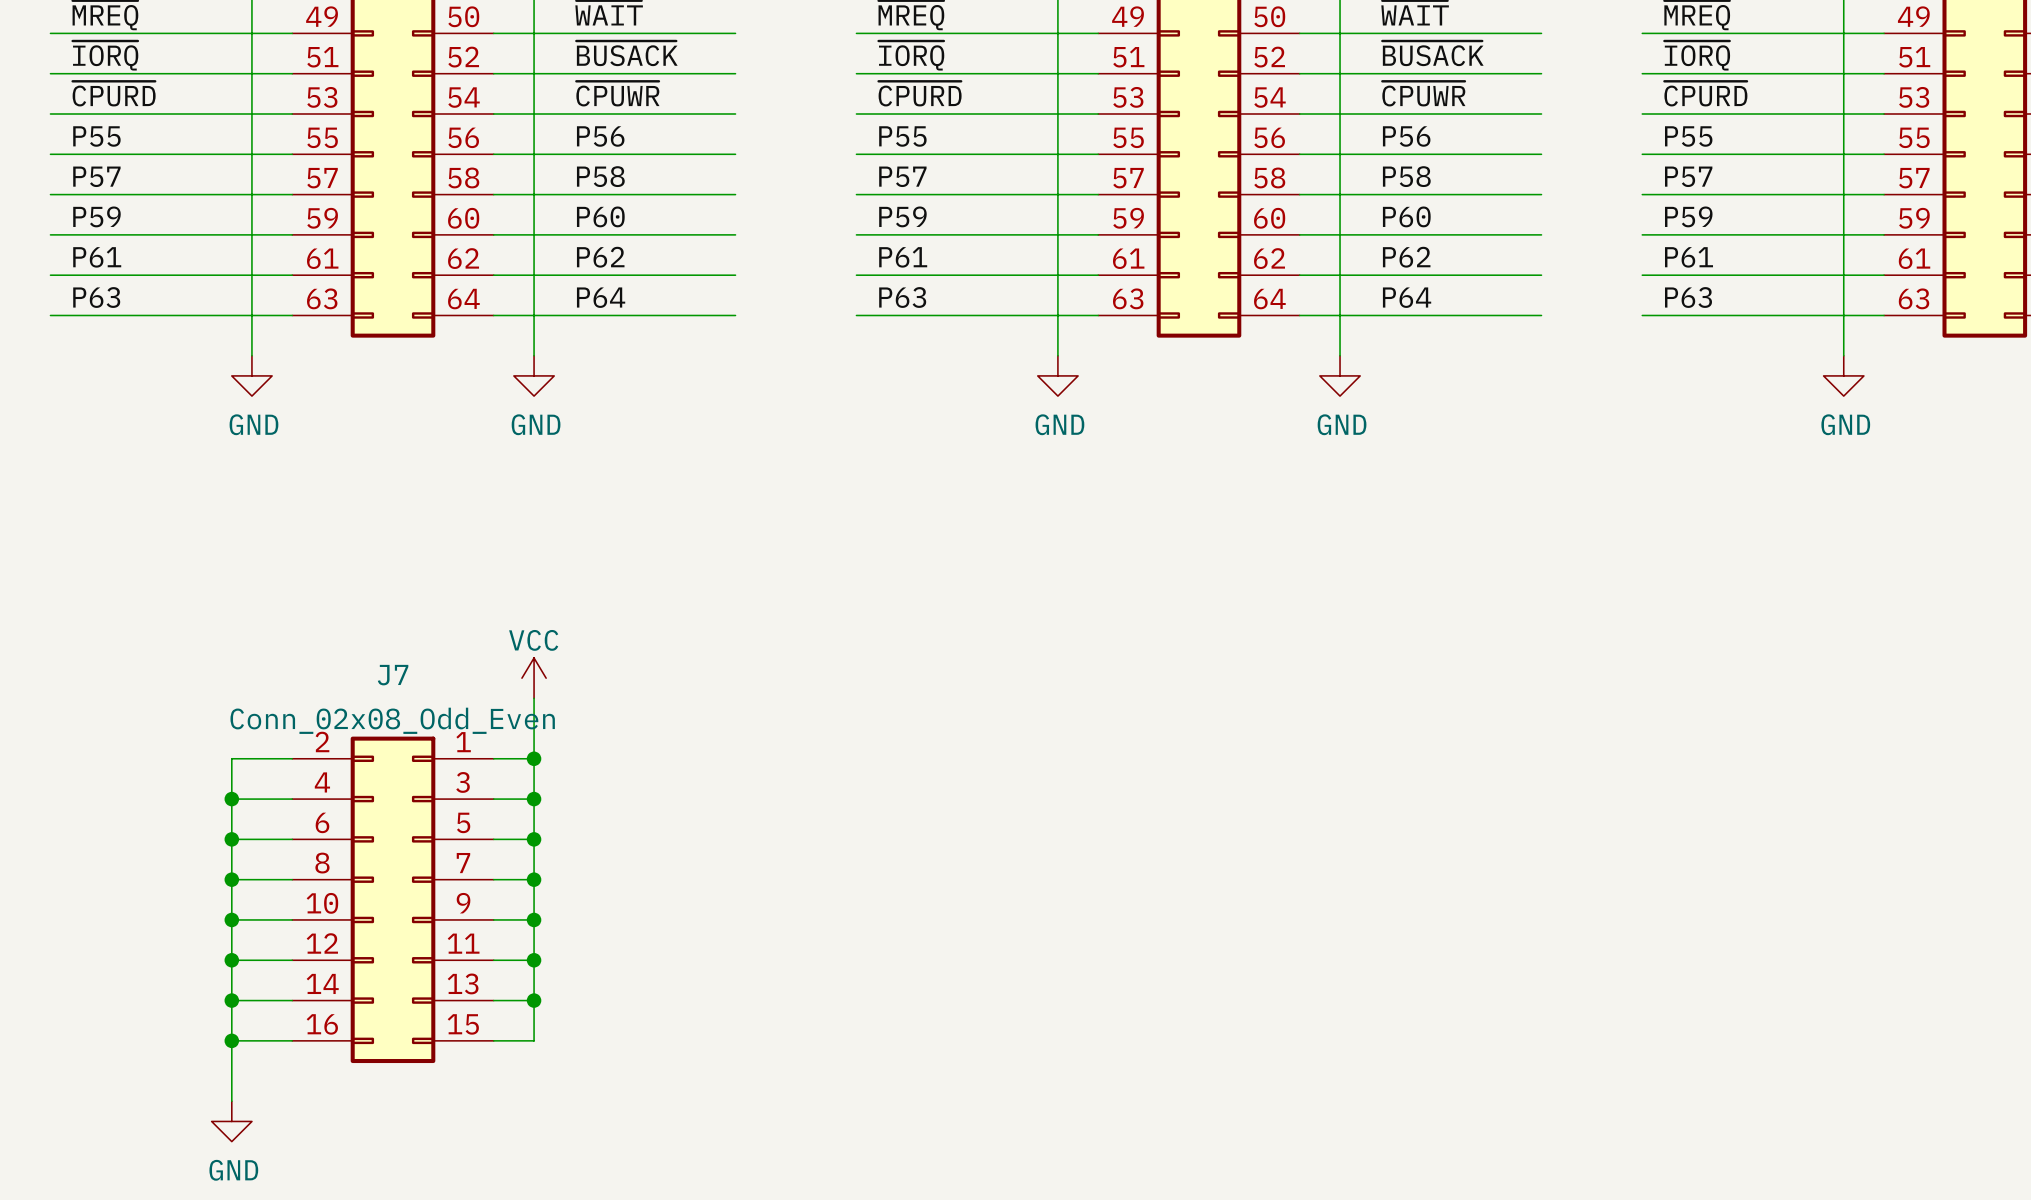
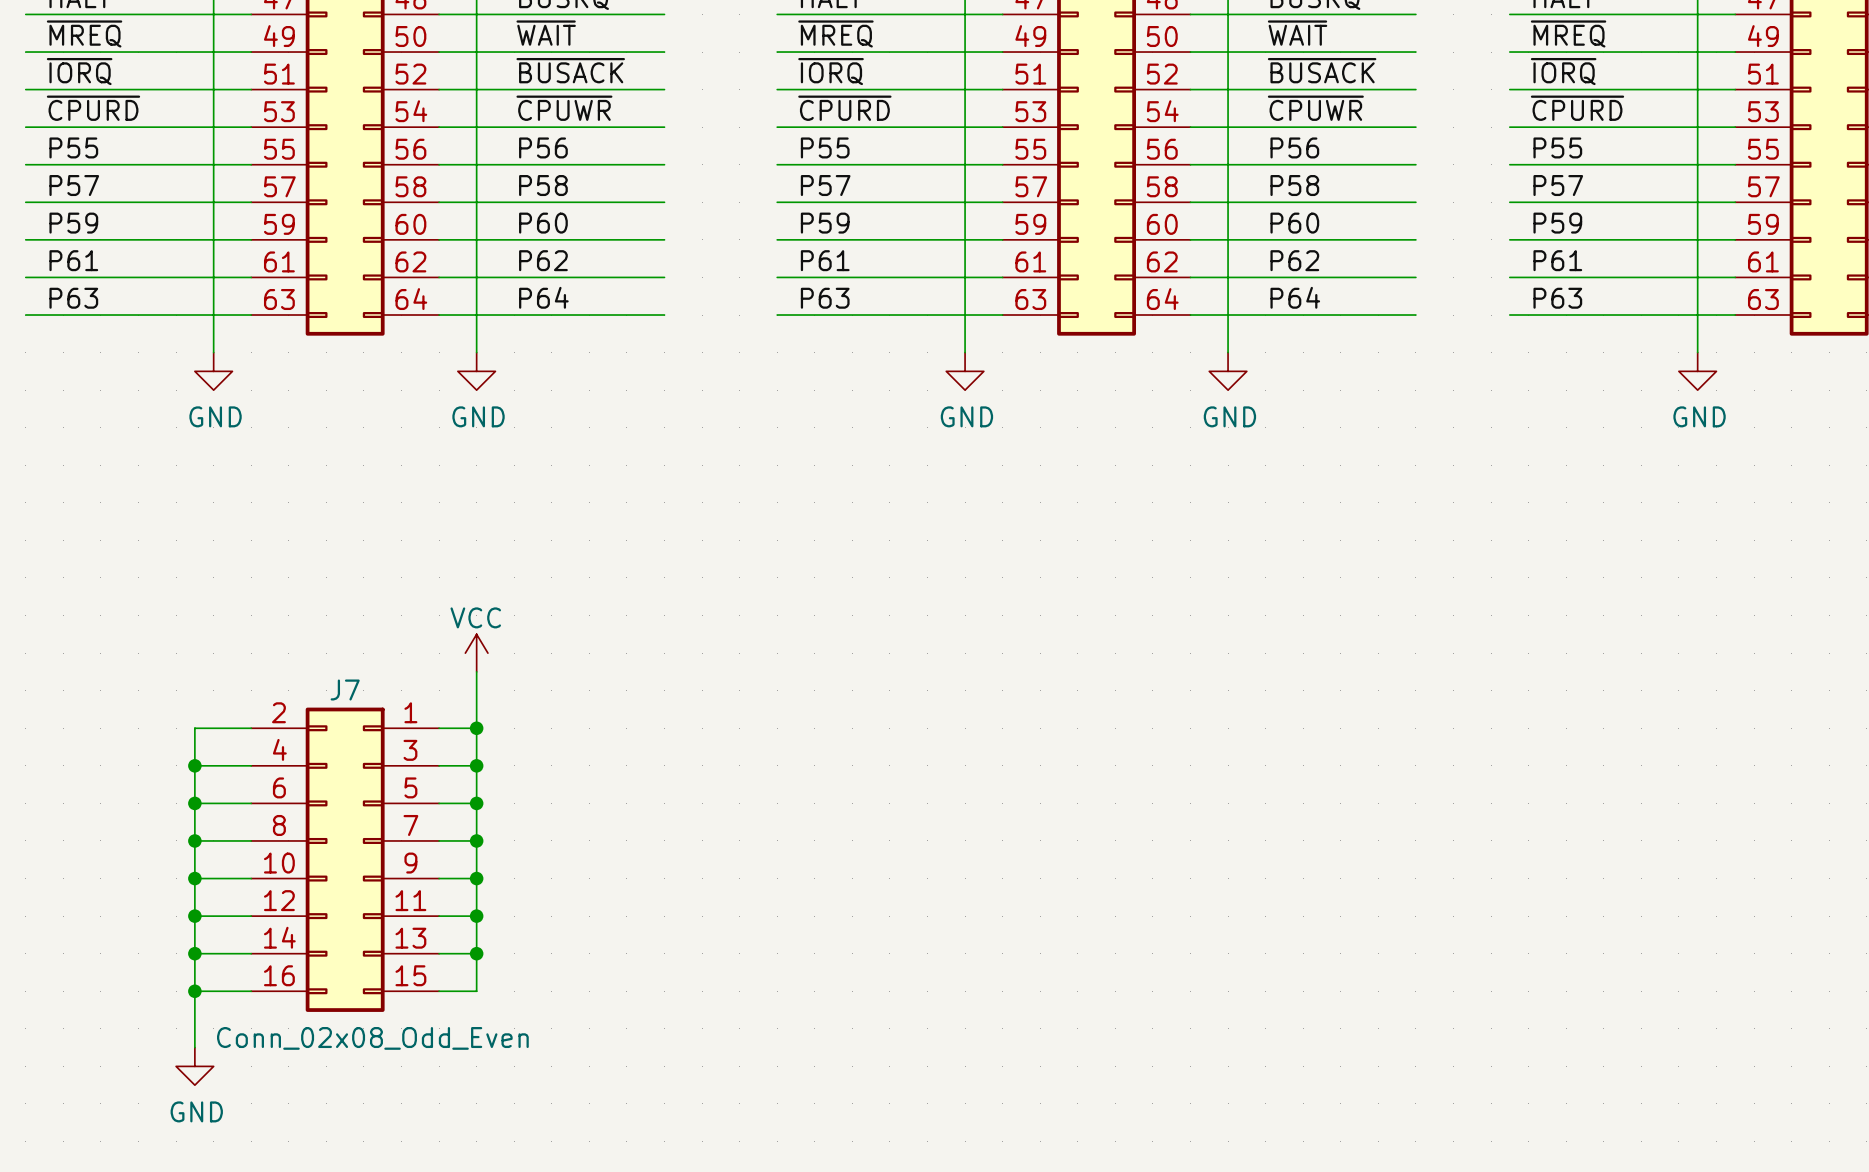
J7 name position: J7 (393, 675) -> J7 (345, 689)
J7 value position: Conn_02x08_Odd_Even (392, 720) -> Conn_02x08_Odd_Even (372, 1038)

